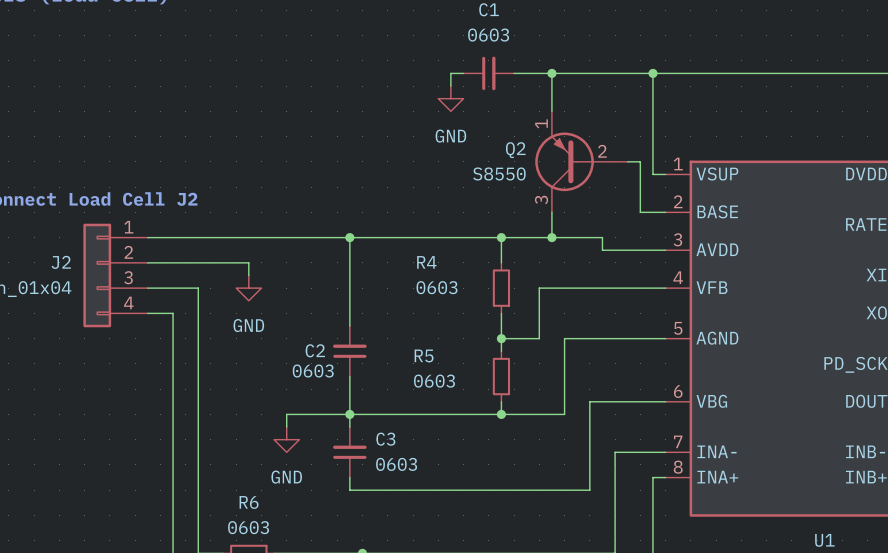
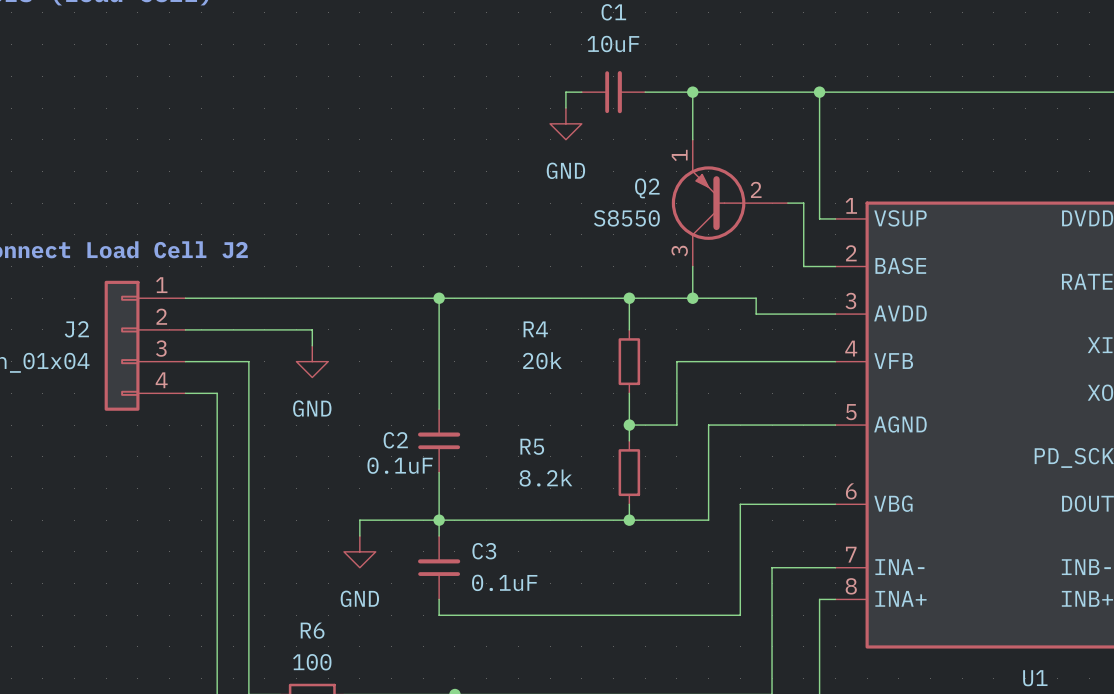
C1 value: 0603 (488, 35) -> 10uF (613, 43)
R4 value: 0603 (437, 287) -> 20k (542, 360)
C2 value: 0603 (313, 371) -> 0.1uF (400, 465)
R5 value: 0603 (434, 381) -> 8.2k (545, 478)
C3 value: 0603 (396, 464) -> 0.1uF (504, 582)
R6 value: 0603 (248, 527) -> 100 (312, 662)

